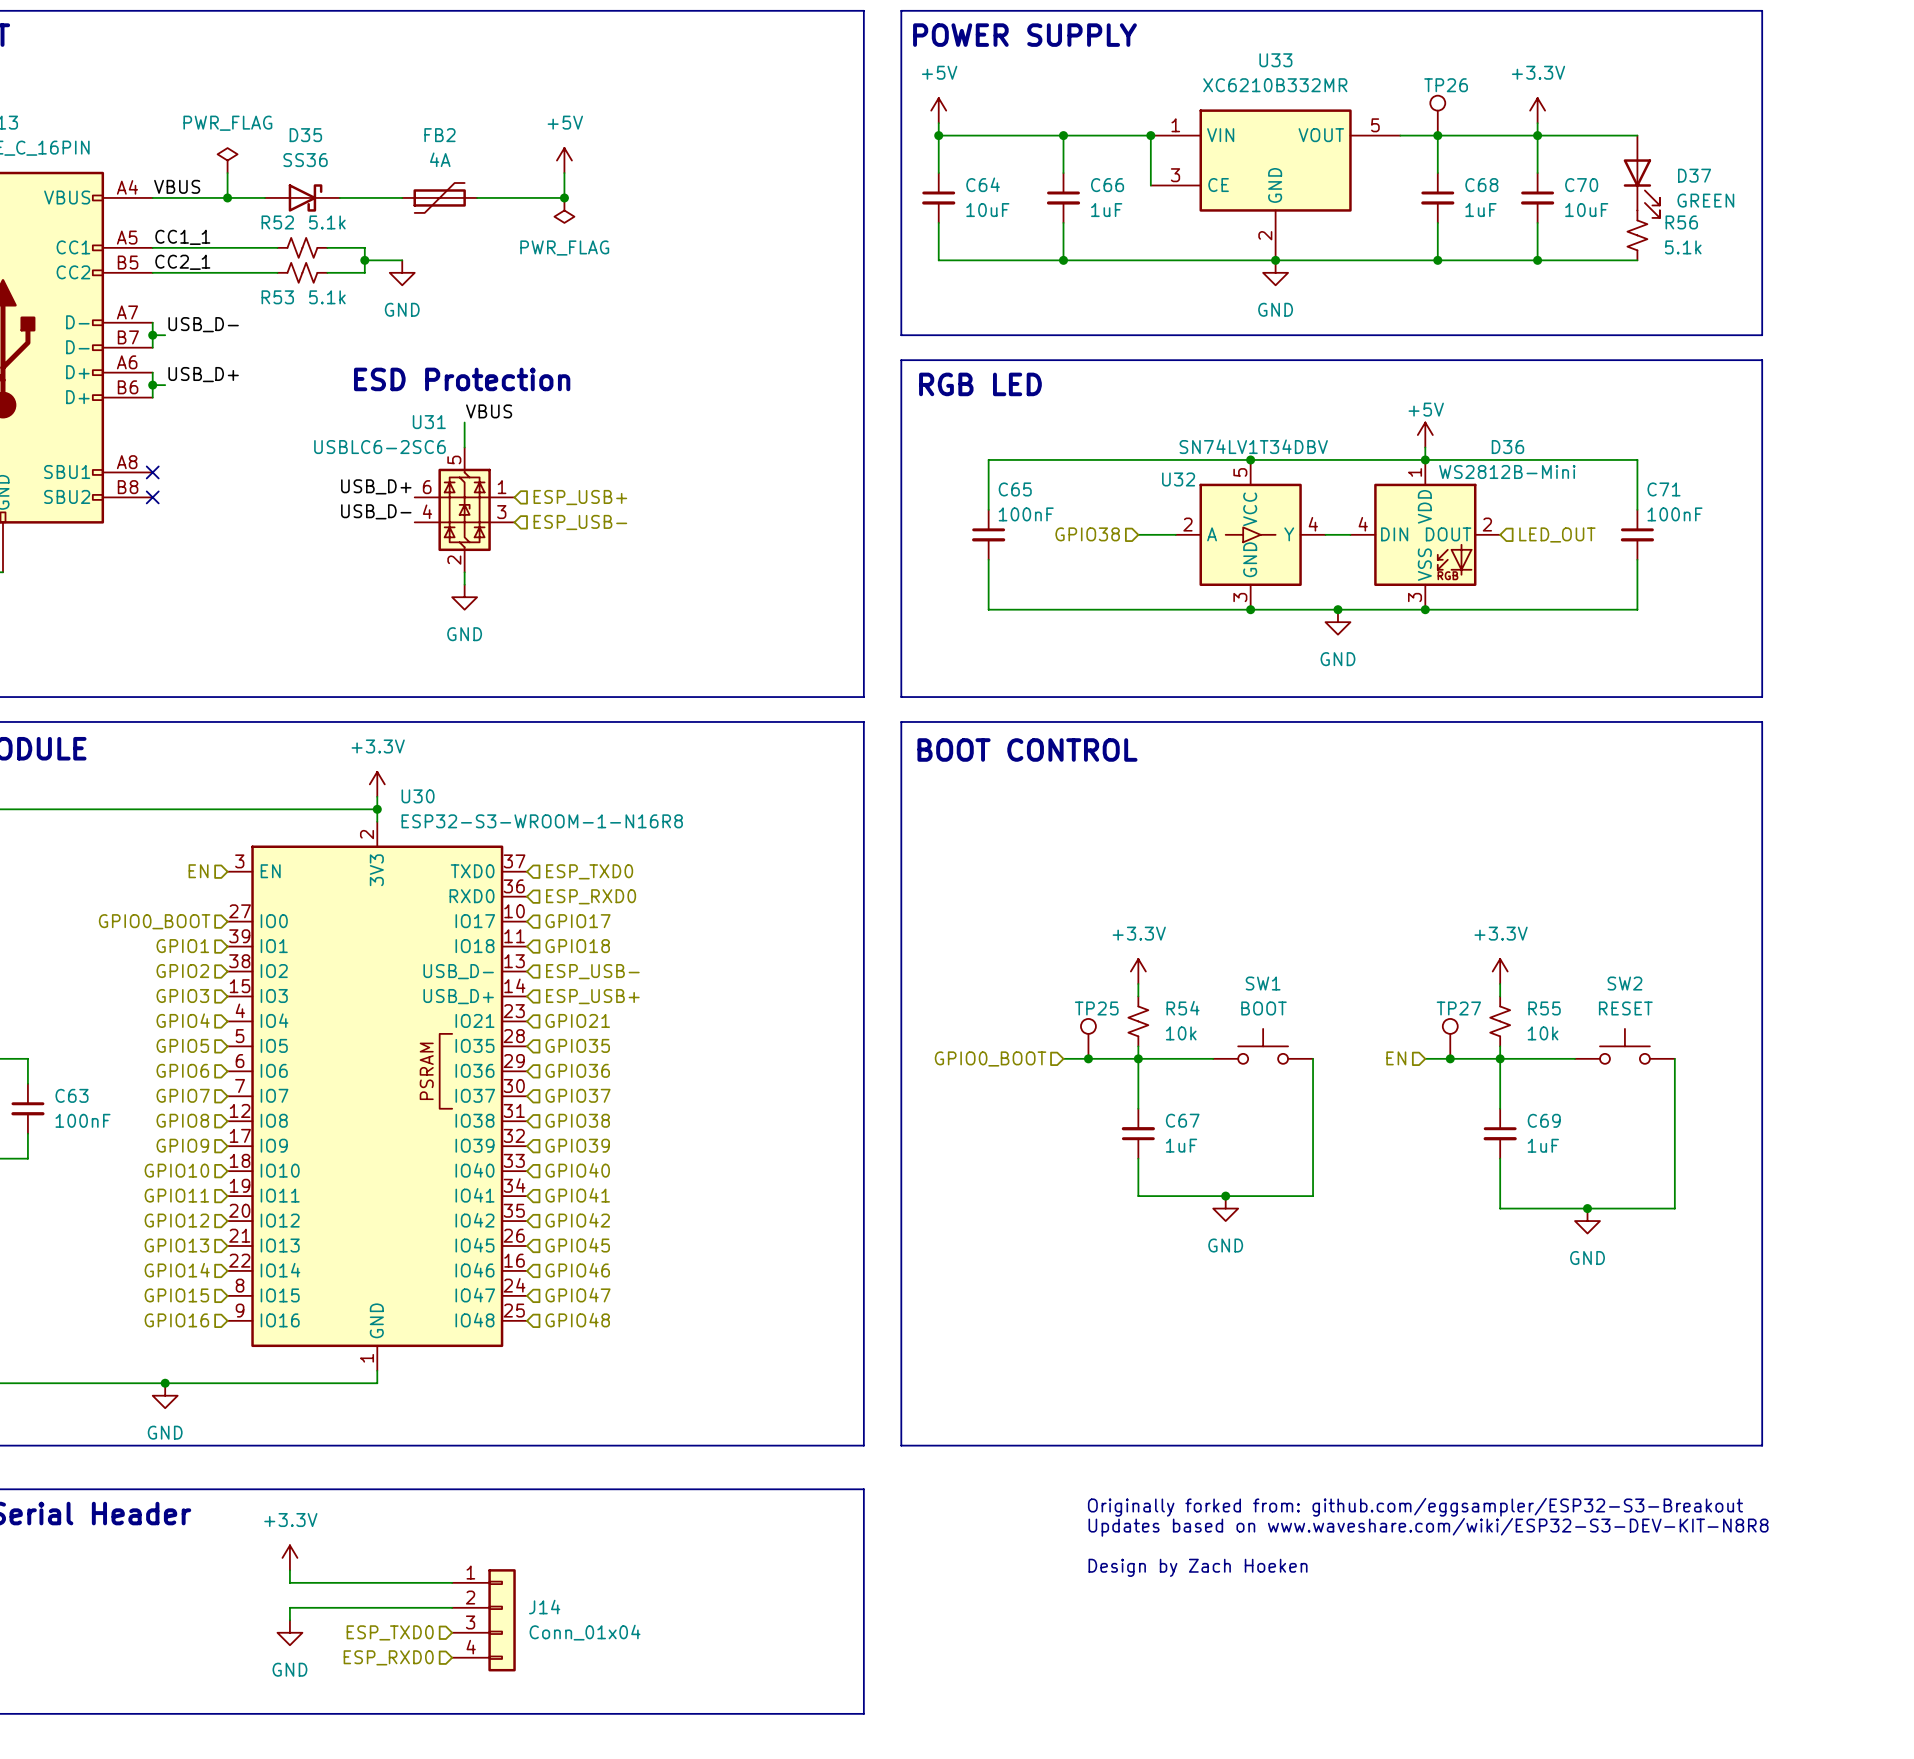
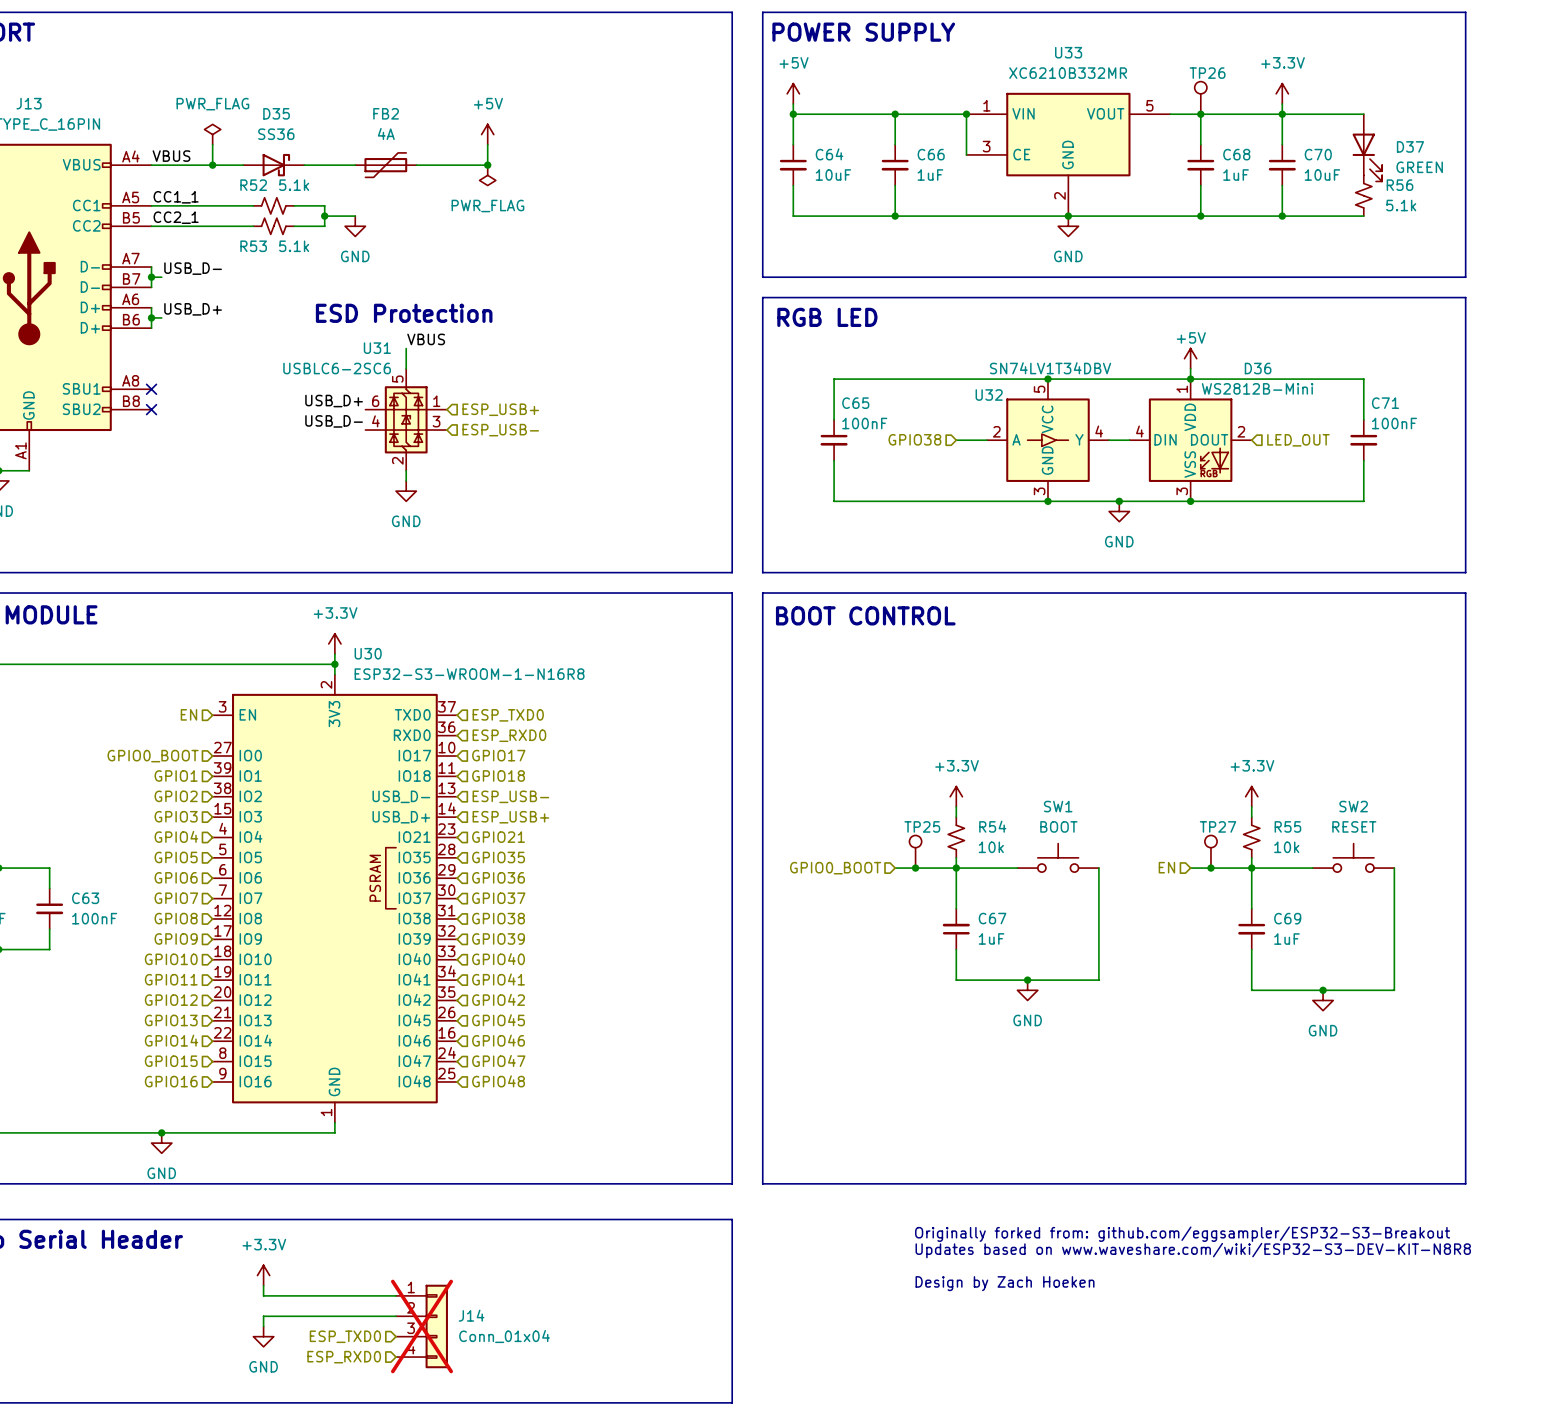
J14 do-not-place cross: none -> (421, 1326)

